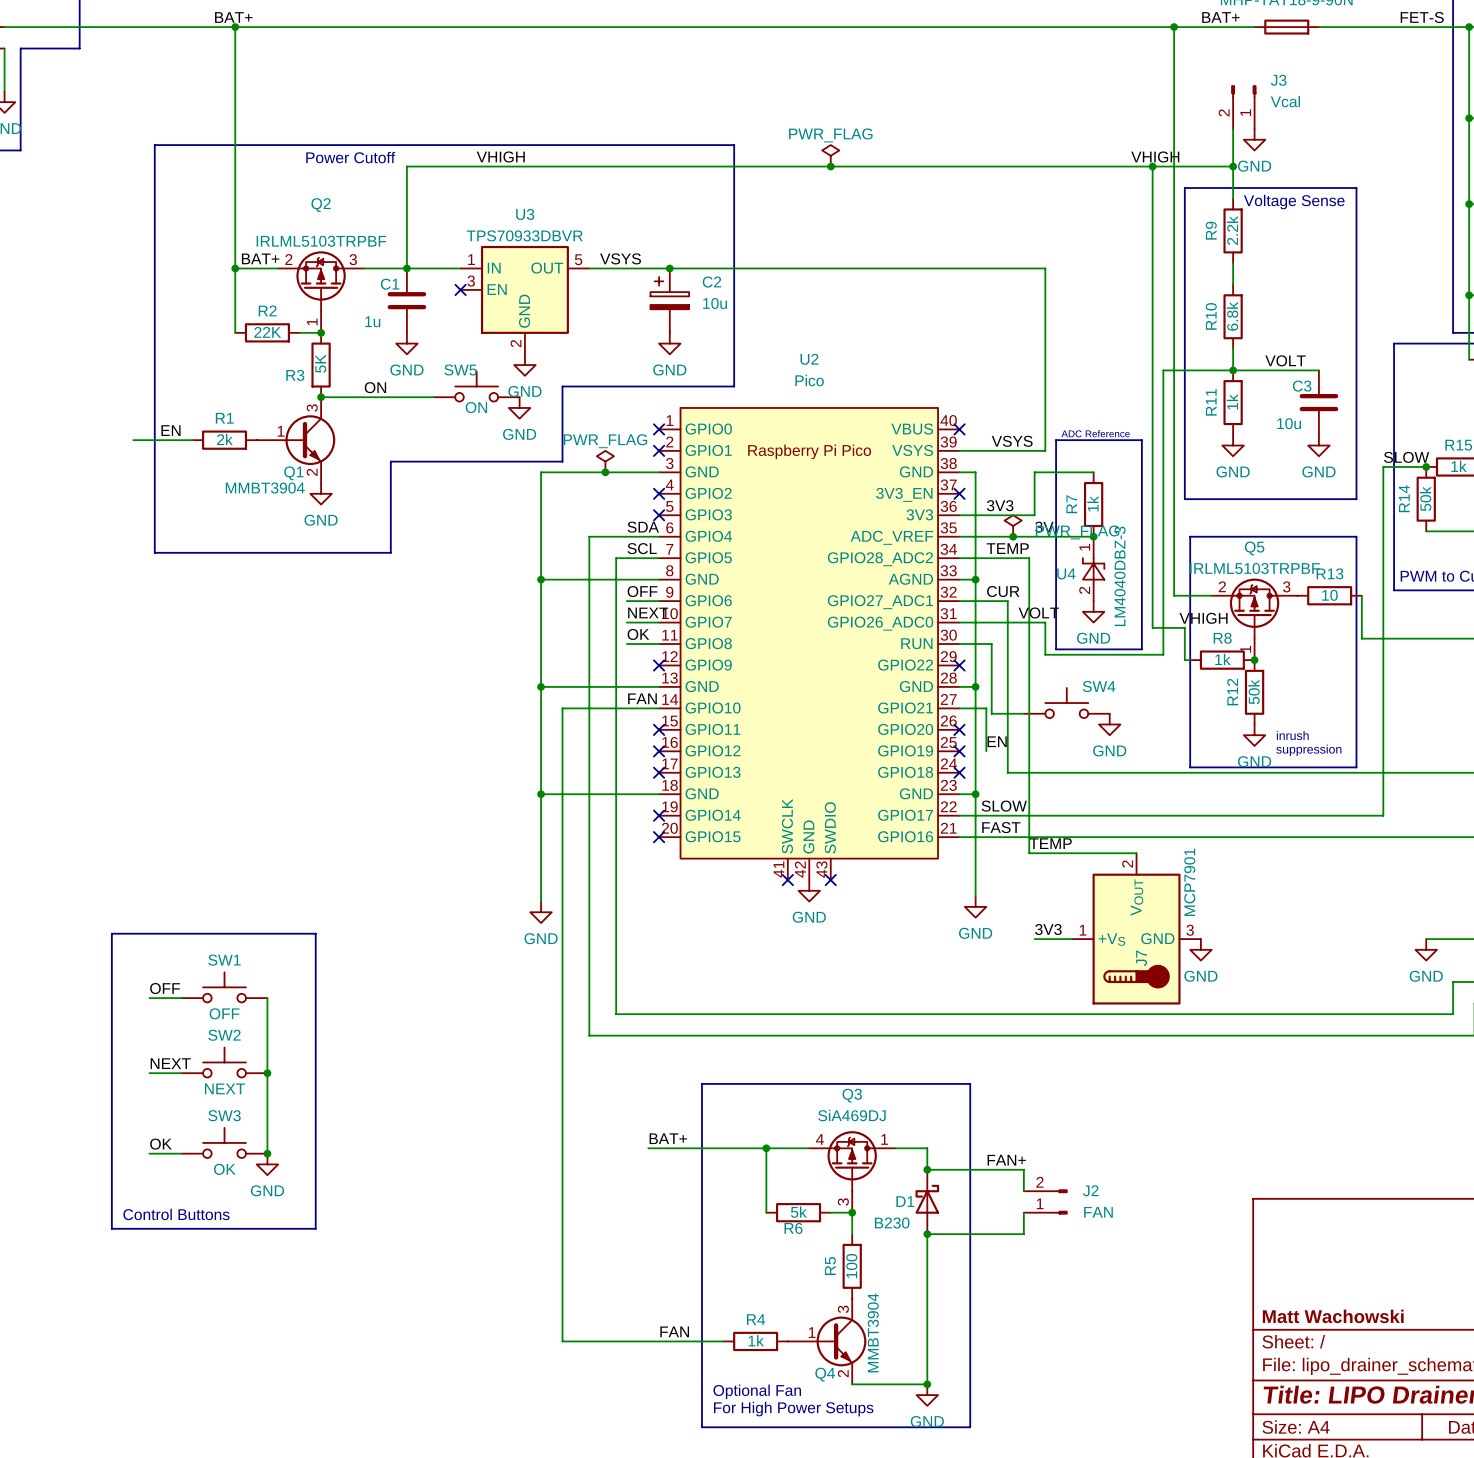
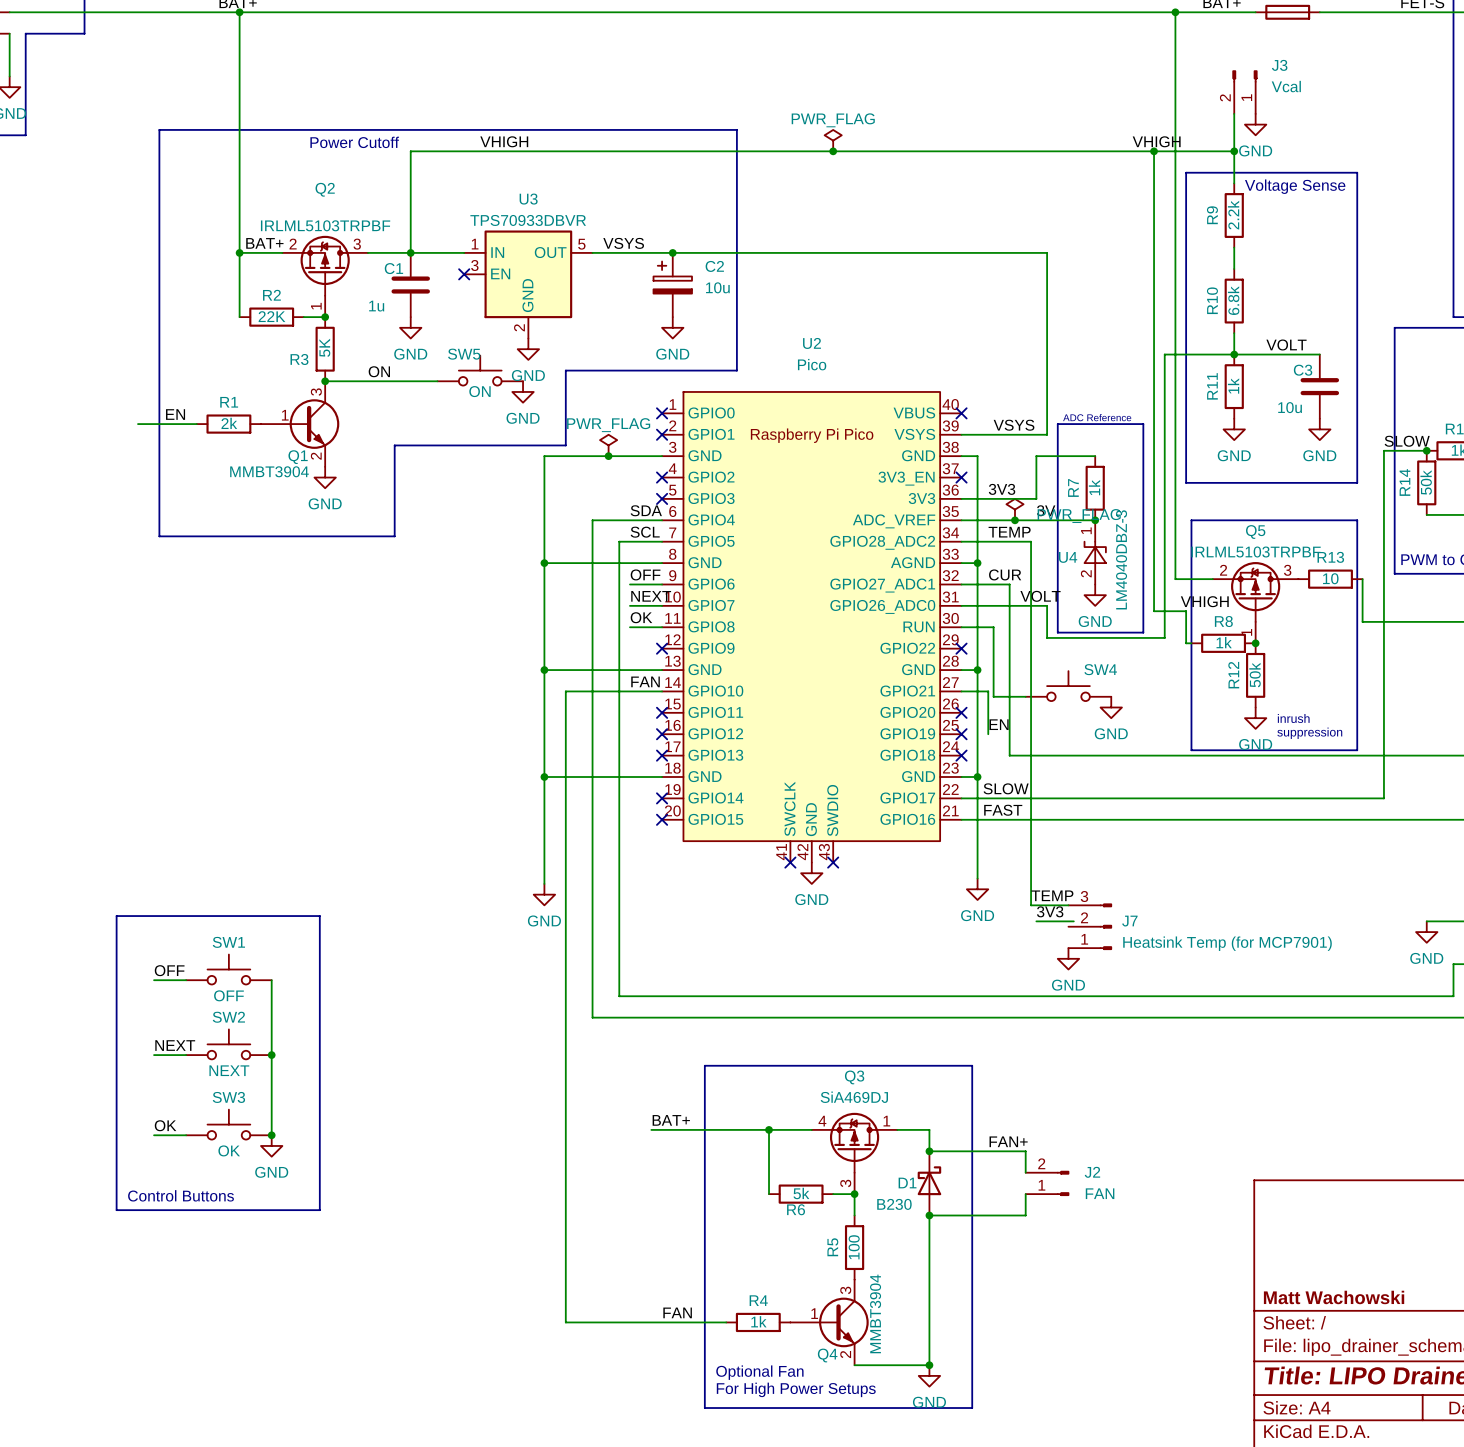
label position: TEMP (1050, 843) -> TEMP (1052, 895)
wire: (1029, 853) (1136, 853) -> (1031, 835) (1031, 905) (1068, 905)
J7 symbol: [1072, 853, 1201, 1005] -> [1068, 903, 1112, 950]
J7 value: MCP7901 (1189, 882) -> Heatsink Temp (for MCP7901) (1227, 943)
power symbol position: GND (1200, 949) -> GND (1068, 958)
J7 name position: J7 (1141, 958) -> J7 (1129, 921)

